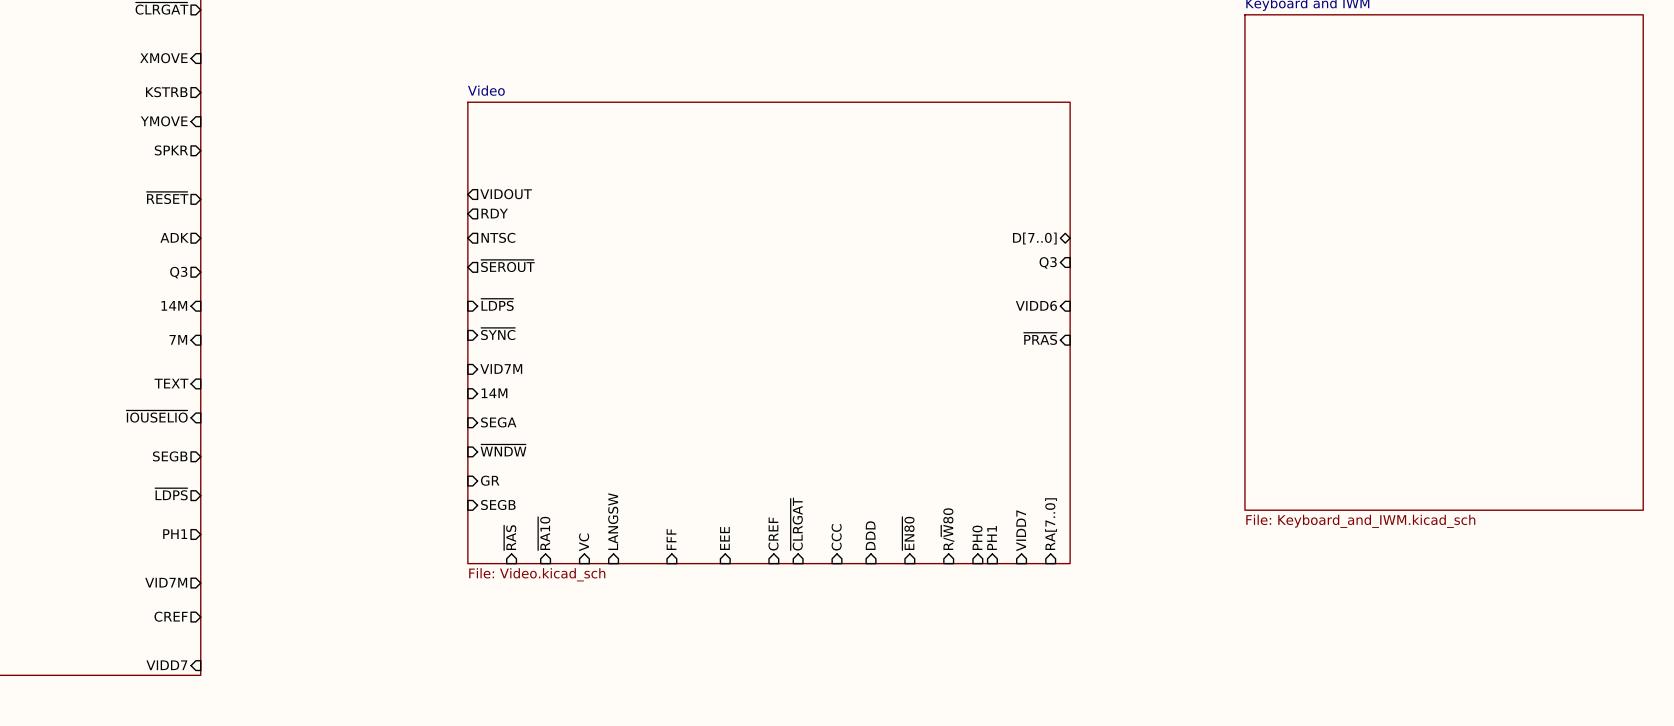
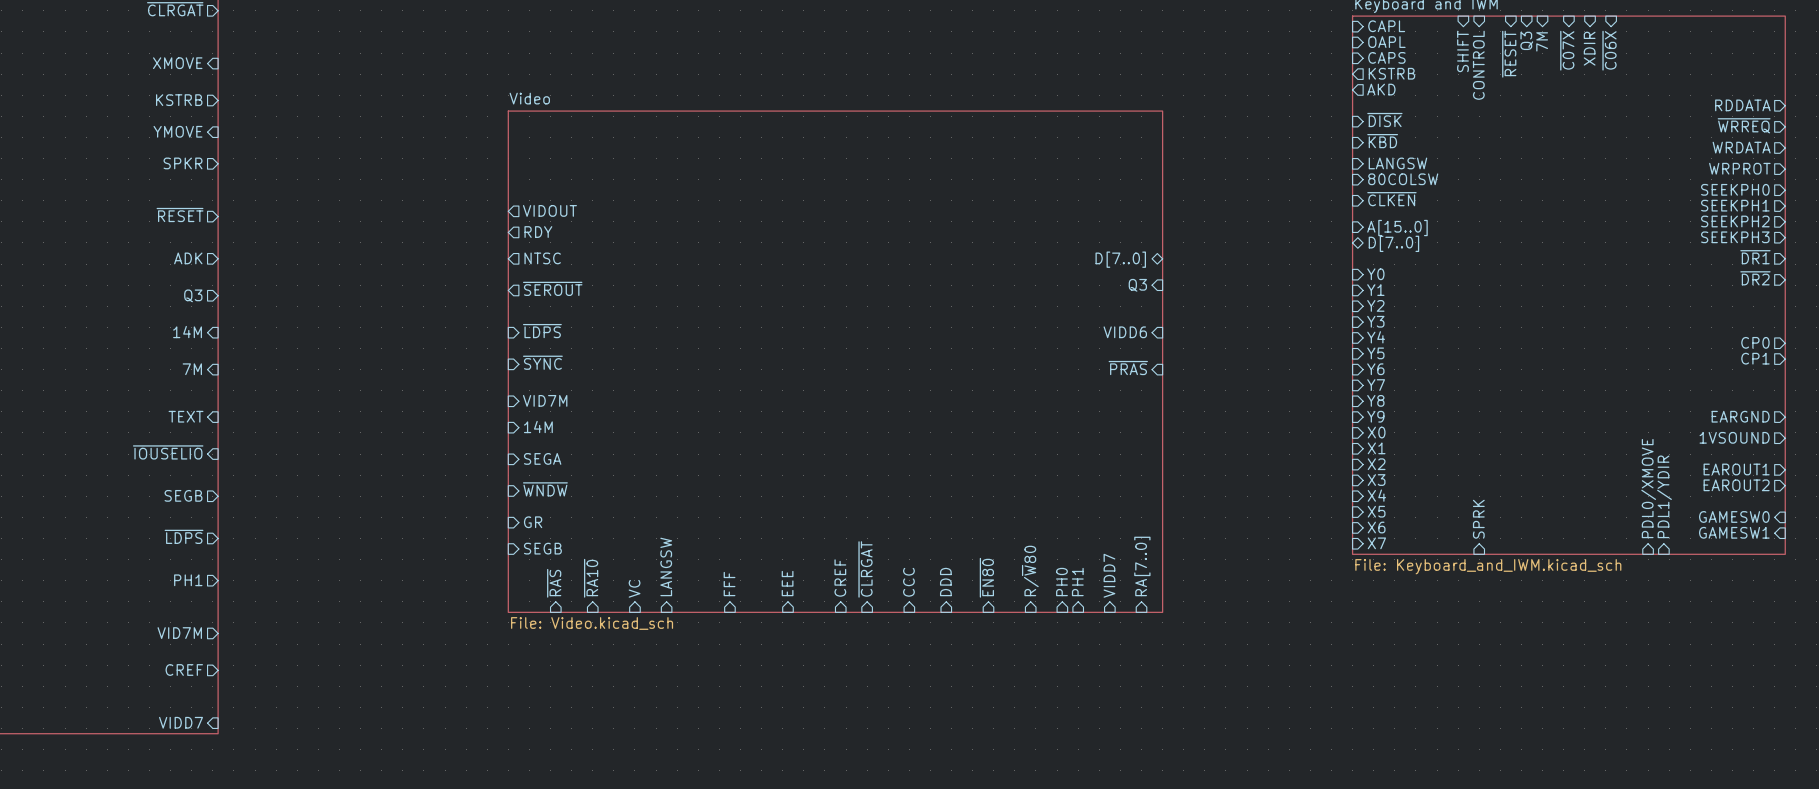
sheet pin: none -> CAPL (1386, 26)
sheet pin: none -> Q3 (1526, 40)
sheet pin: none -> 7M (1542, 41)
sheet pin: none -> OAPL (1386, 42)
sheet pin: none -> XDIR (1589, 48)
sheet pin: none -> ~{C07X} (1567, 50)
sheet pin: none -> ~{C06X} (1609, 50)
sheet pin: none -> SHIFT (1462, 51)
sheet pin: none -> ~{RESET} (1509, 54)
sheet pin: none -> CAPS (1386, 57)
sheet pin: none -> CONTROL (1478, 65)
sheet pin: none -> KSTRB (1391, 73)
sheet pin: none -> AKD (1381, 89)
sheet pin: none -> RDDATA (1742, 105)
sheet pin: none -> ~{DISK} (1384, 120)
sheet pin: none -> ~{WRREQ} (1744, 125)
sheet pin: none -> ~{KBD} (1382, 141)
sheet pin: none -> WRDATA (1741, 147)
sheet pin: none -> LANGSW (1397, 163)
sheet pin: none -> WRPROT (1739, 168)
sheet pin: none -> 80COLSW (1403, 179)
sheet pin: none -> SEEKPH0 (1735, 189)
sheet pin: none -> ~{CLKEN} (1391, 199)
sheet pin: none -> SEEKPH1 (1735, 205)
sheet pin: none -> SEEKPH2 (1735, 221)
sheet pin: none -> A[15..0] (1397, 228)
sheet pin: none -> SEEKPH3 (1735, 237)
sheet pin: none -> D[7..0] (1393, 243)
sheet pin: none -> ~{DR1} (1755, 257)
sheet pin: none -> Y0 (1375, 274)
sheet pin: none -> ~{DR2} (1755, 278)
sheet pin: none -> Y1 (1375, 290)
sheet pin: none -> Y2 (1375, 305)
sheet pin: none -> Y3 (1375, 321)
sheet pin: none -> Y4 (1376, 337)
sheet pin: none -> CP0 (1755, 342)
sheet pin: none -> Y5 (1375, 353)
sheet pin: none -> CP1 (1755, 358)
sheet pin: none -> Y6 (1375, 369)
sheet pin: none -> Y7 (1376, 385)
sheet pin: none -> Y8 (1375, 400)
sheet pin: none -> Y9 (1375, 416)
sheet pin: none -> EARGND (1740, 416)
sheet pin: none -> X0 (1376, 432)
sheet pin: none -> 1VSOUND (1734, 437)
sheet pin: none -> X1 (1376, 448)
sheet pin: none -> X2 (1376, 464)
sheet pin: none -> EAROUT1 (1736, 469)
sheet pin: none -> X3 (1376, 480)
sheet pin: none -> EAROUT2 (1736, 485)
sheet pin: none -> PDL0/XMOVE (1648, 488)
sheet pin: none -> X4 (1376, 495)
sheet pin: none -> PDL1/YDIR (1664, 496)
sheet pin: none -> X5 (1376, 511)
sheet pin: none -> GAMESW0 (1734, 516)
sheet pin: none -> SPRK (1478, 519)
sheet pin: none -> X6 (1376, 527)
sheet pin: none -> GAMESW1 (1734, 532)
sheet pin: none -> X7 (1376, 543)

